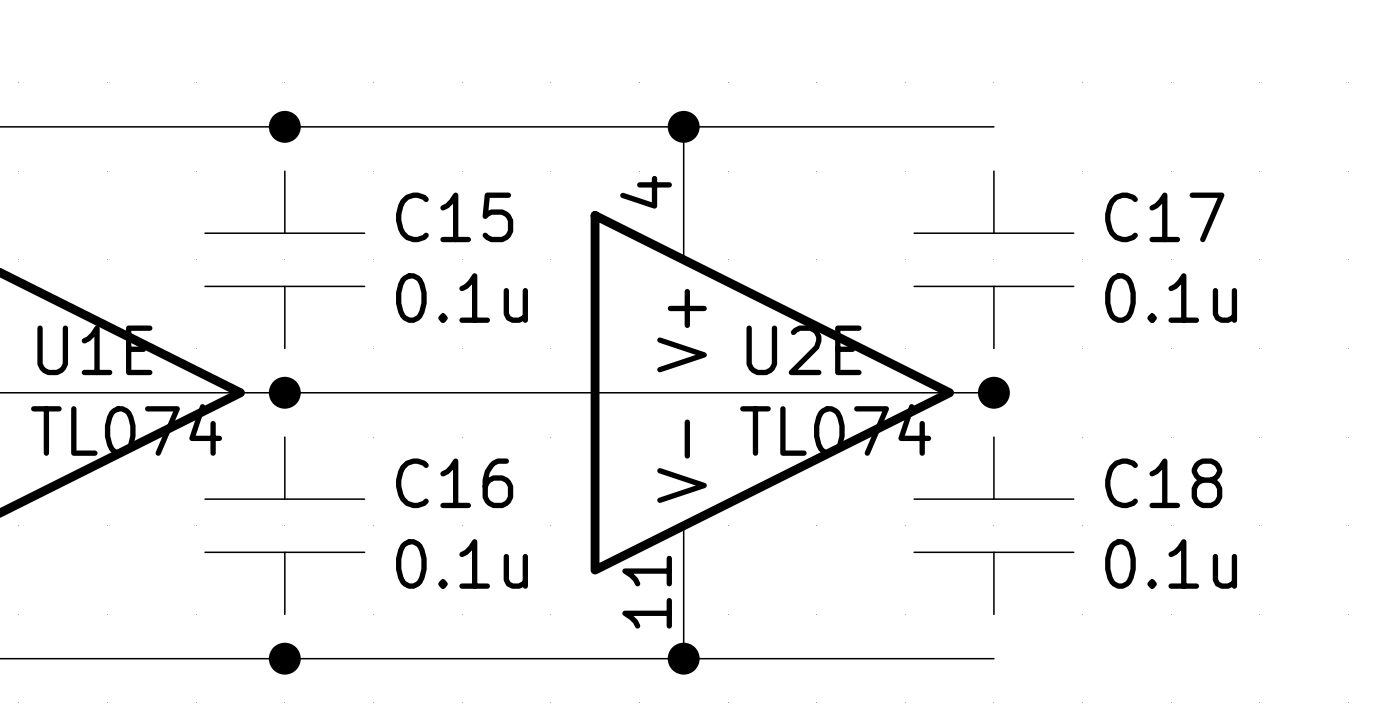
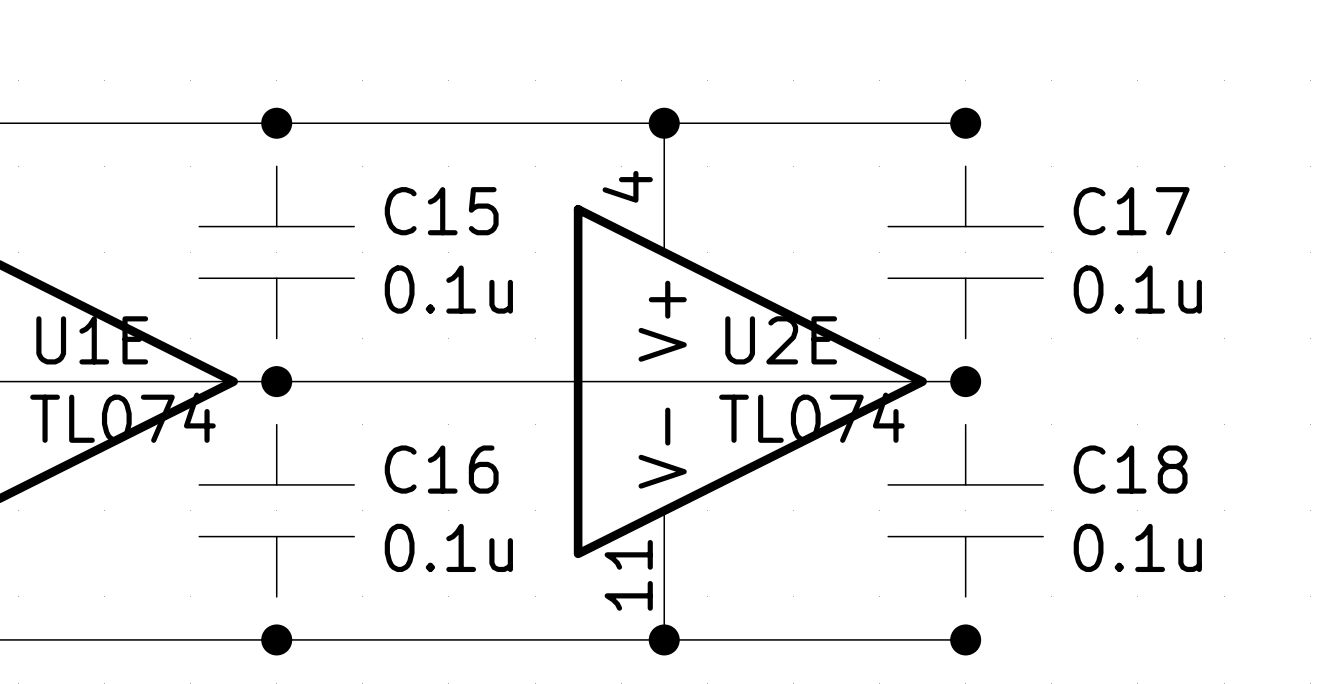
junction: none -> (965, 123)
junction: none -> (965, 639)

